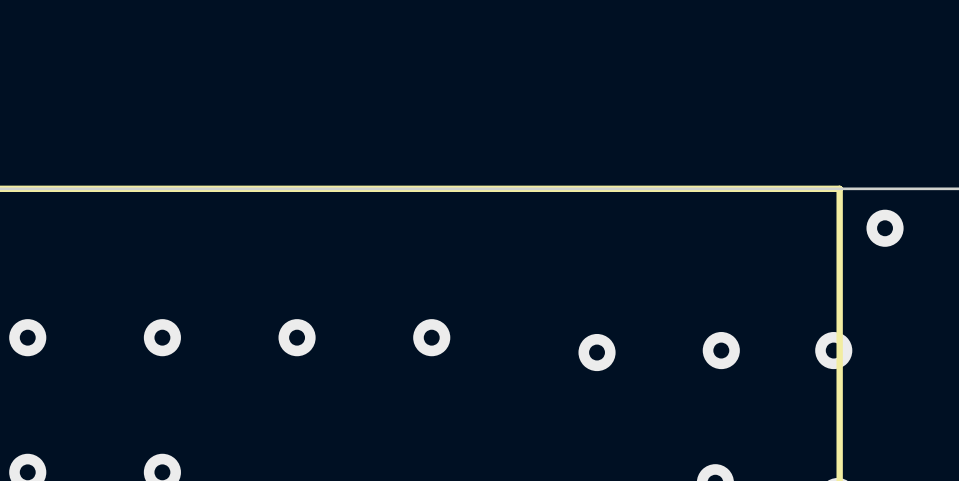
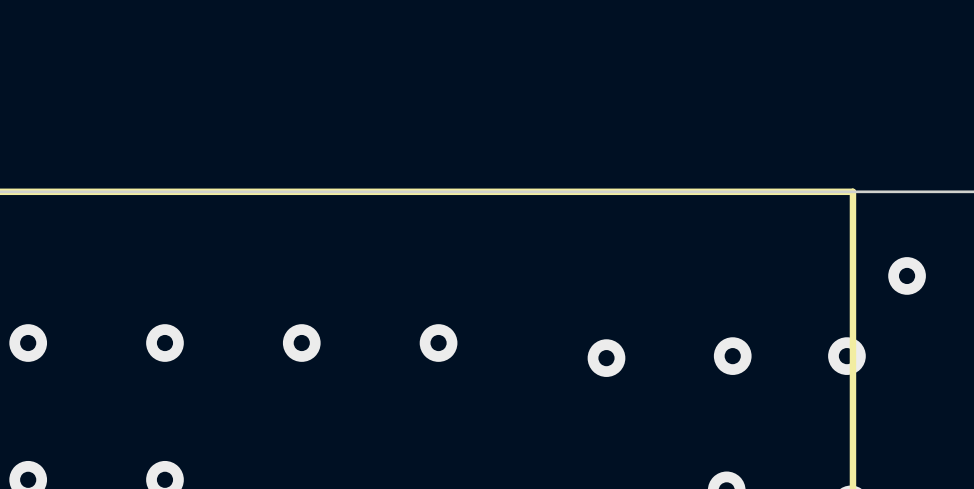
via position: (885, 228) -> (907, 275)

